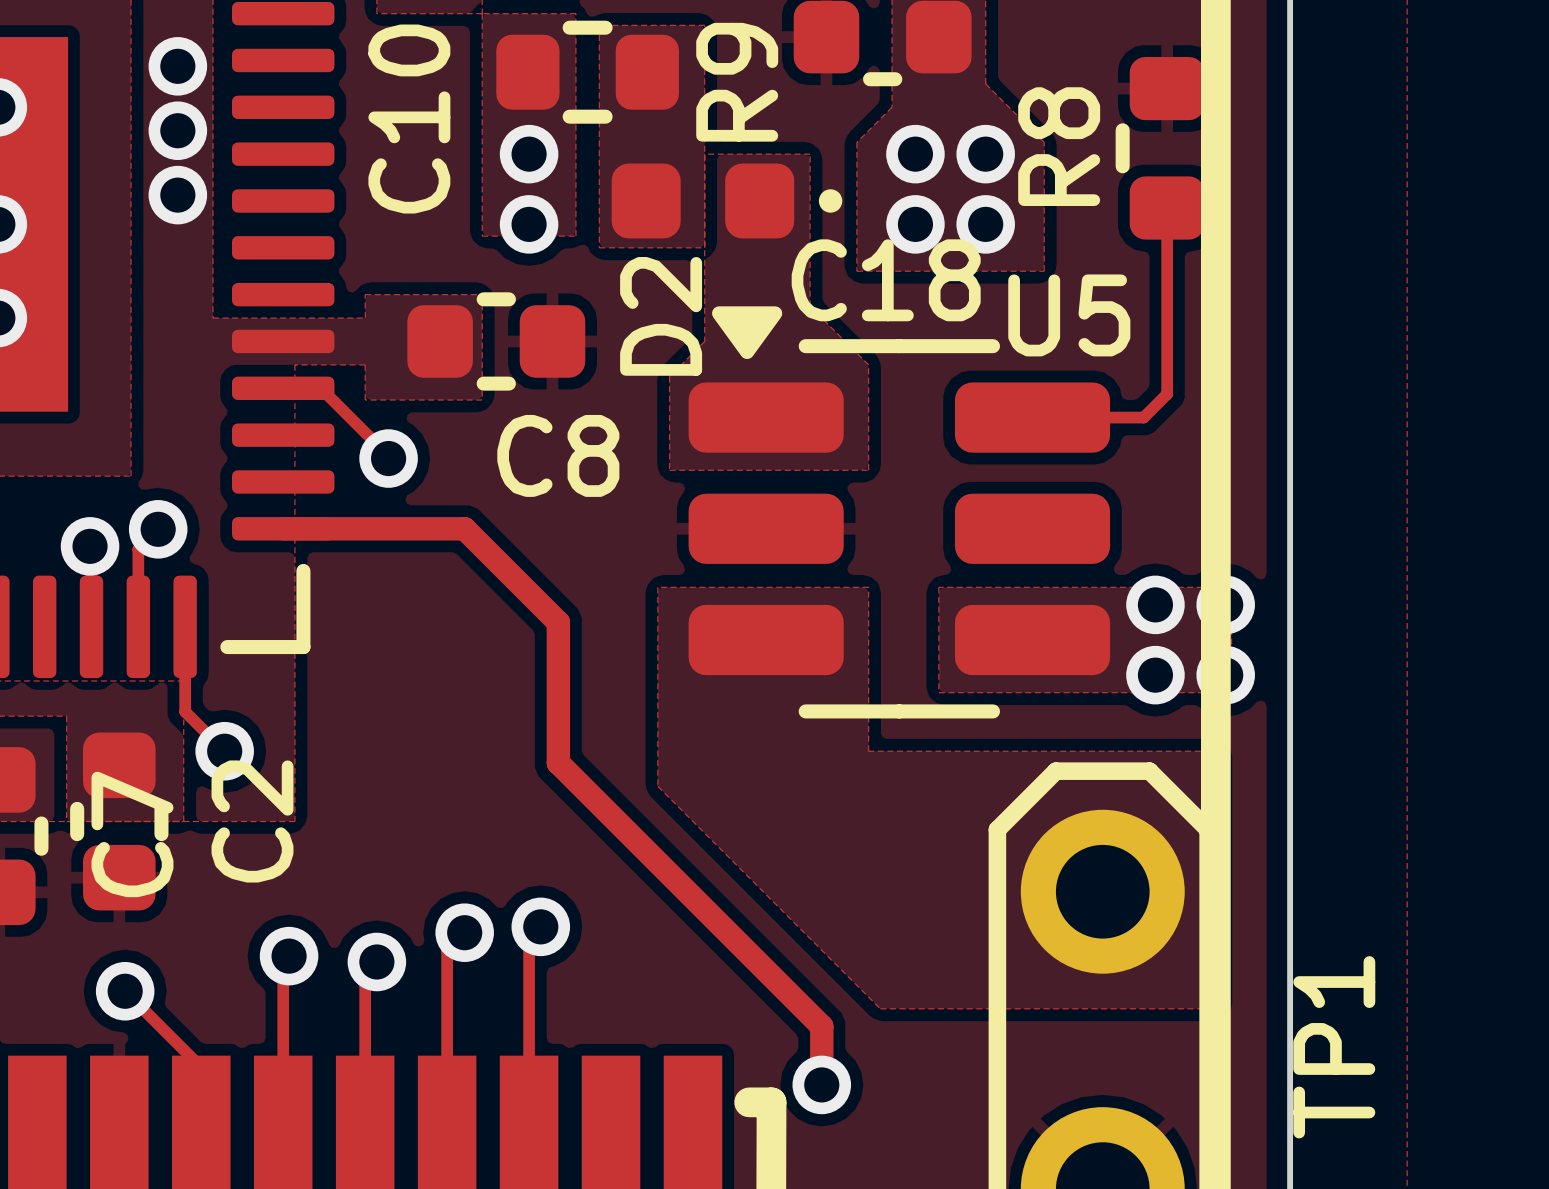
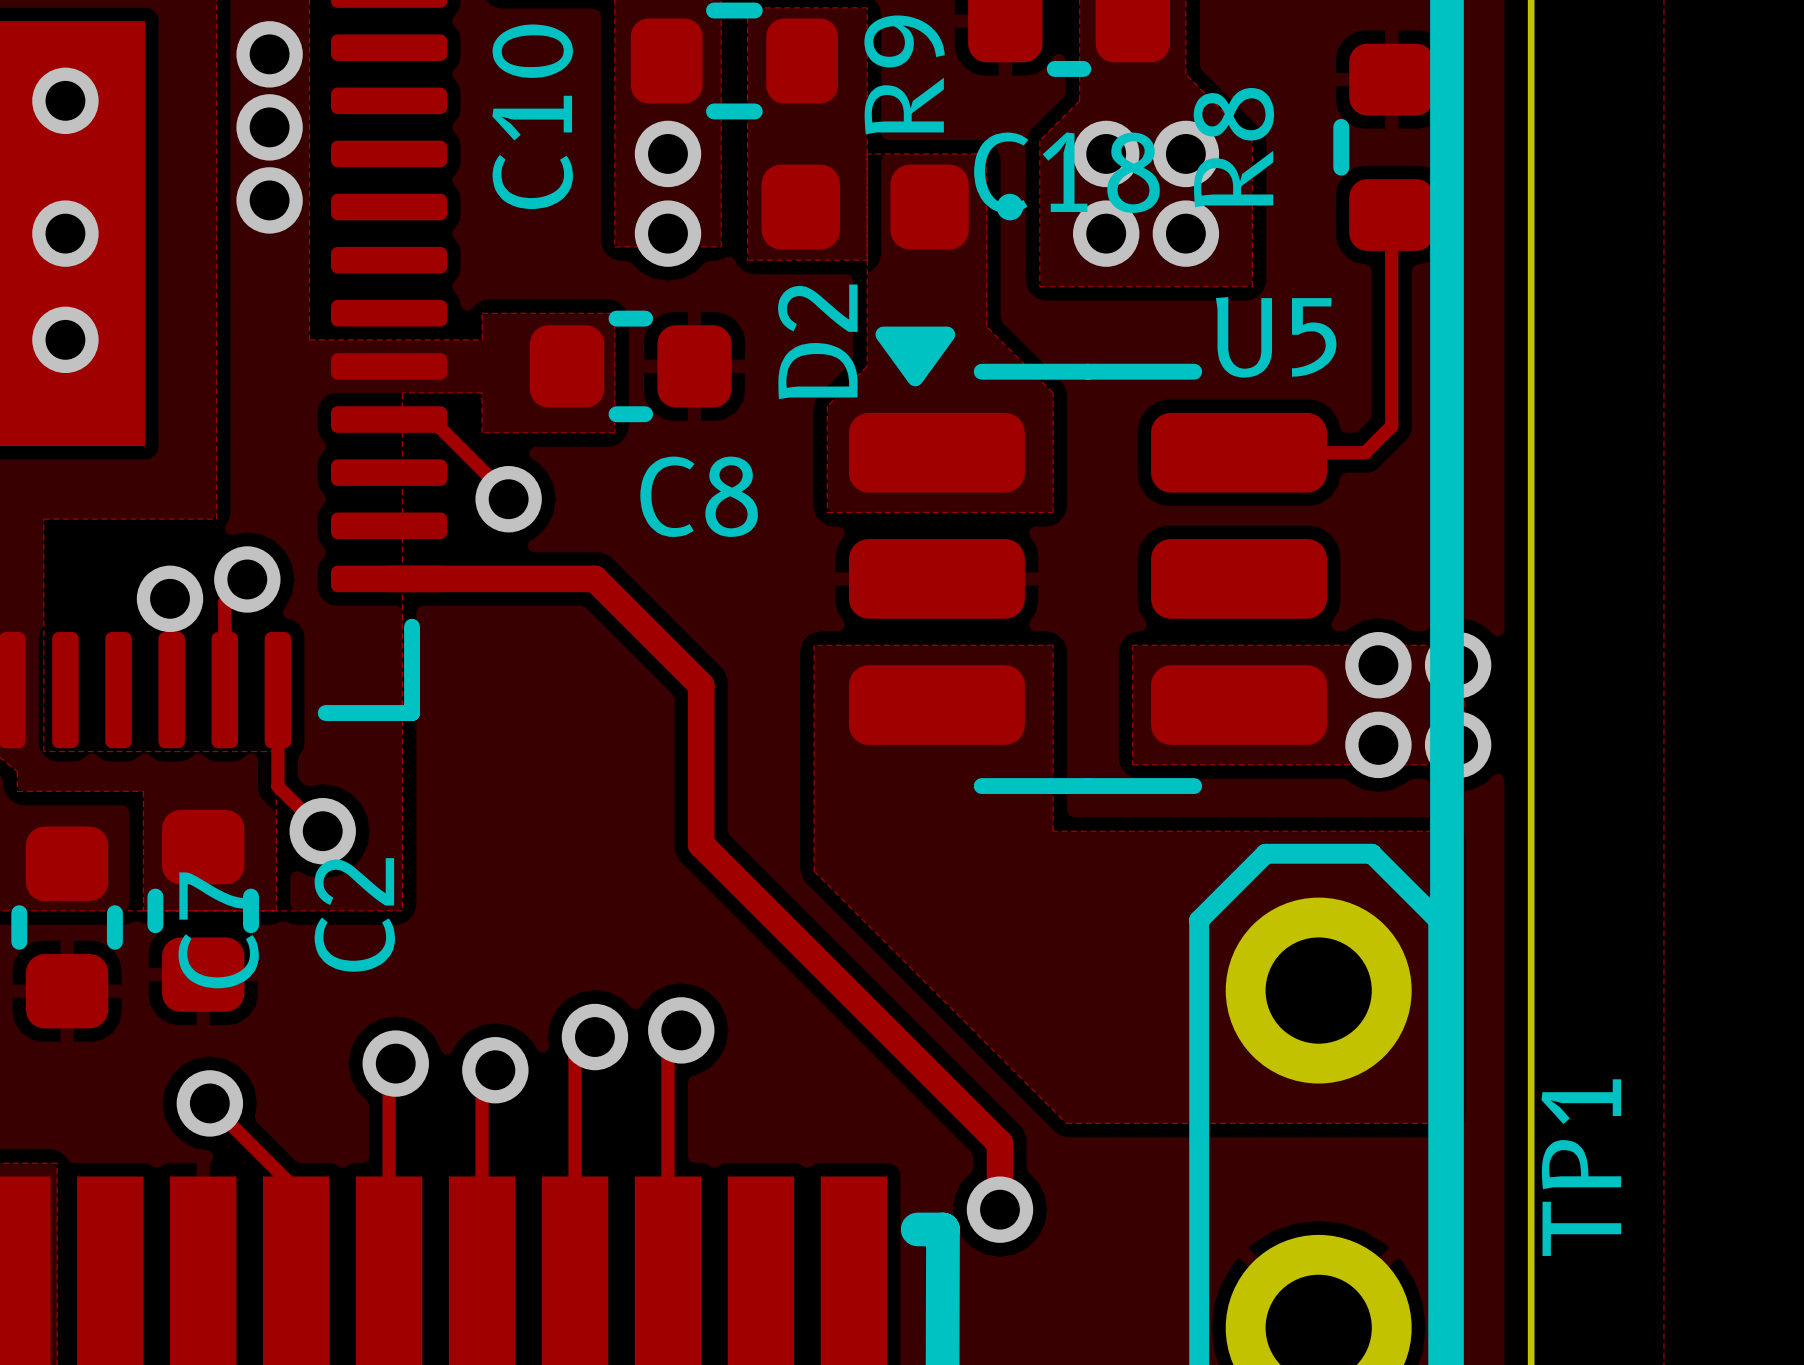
R8 name position: R8 (1059, 146) -> R8 (1233, 147)
C18 name position: C18 (886, 280) -> C18 (1066, 172)

